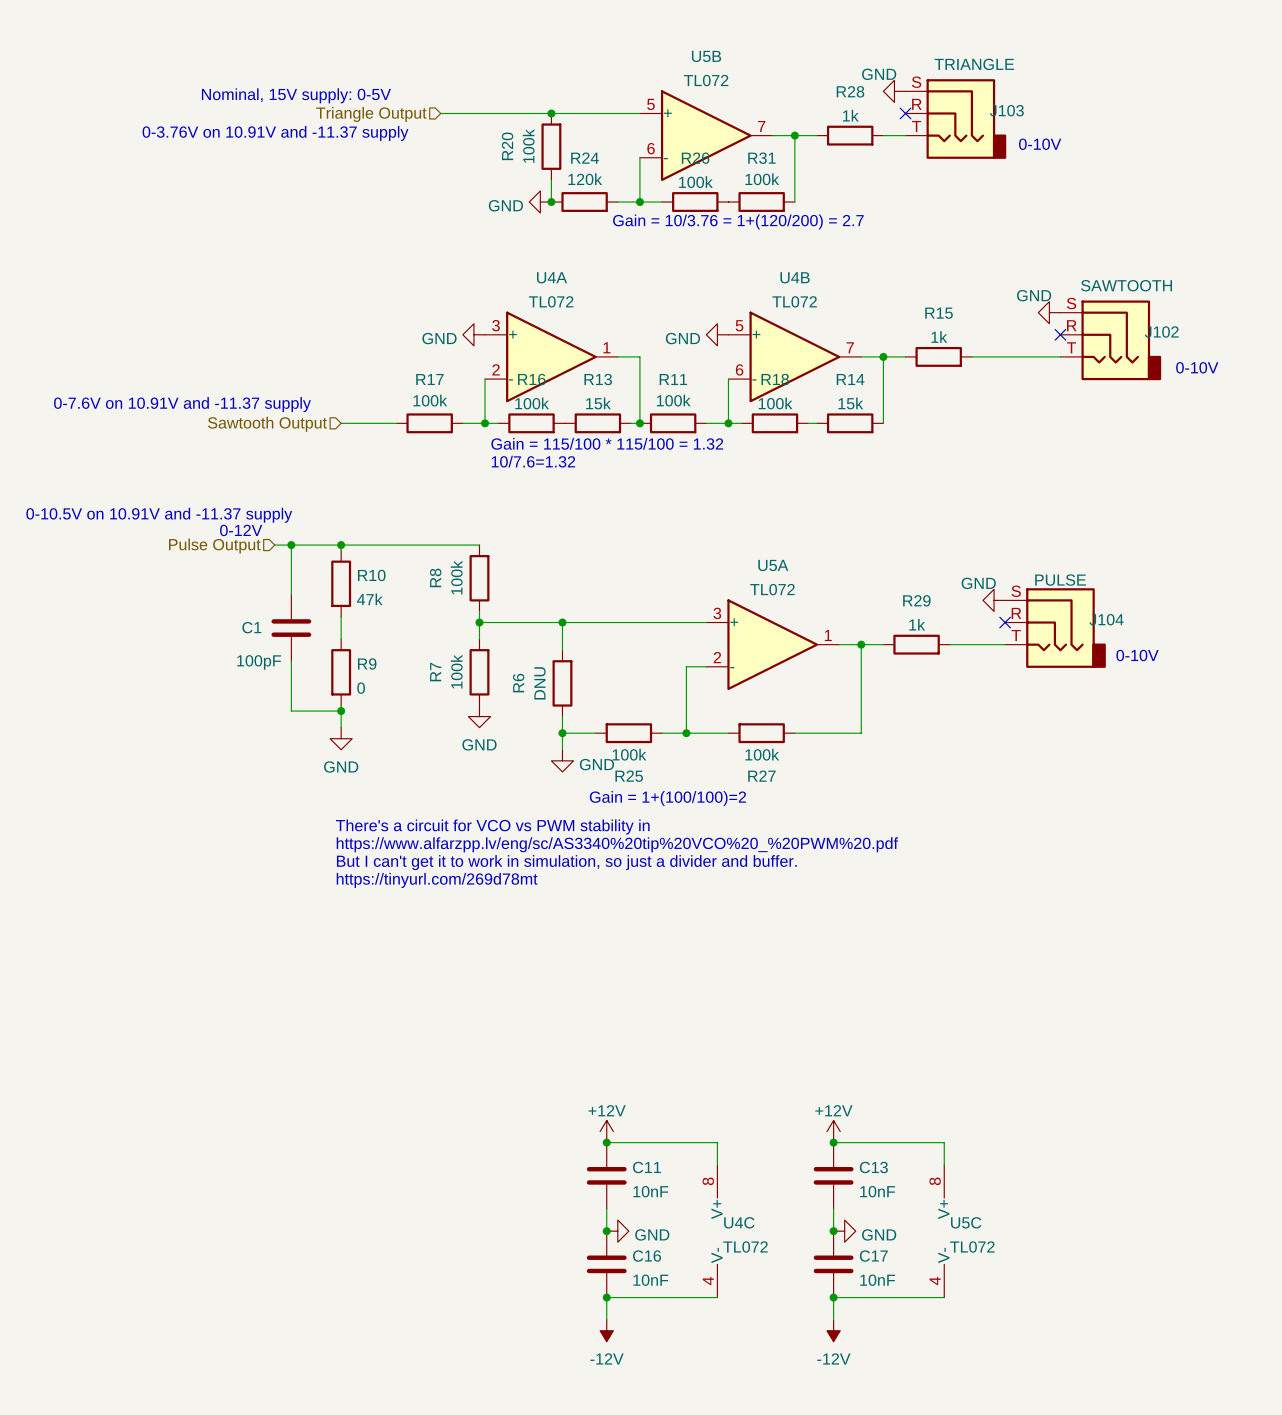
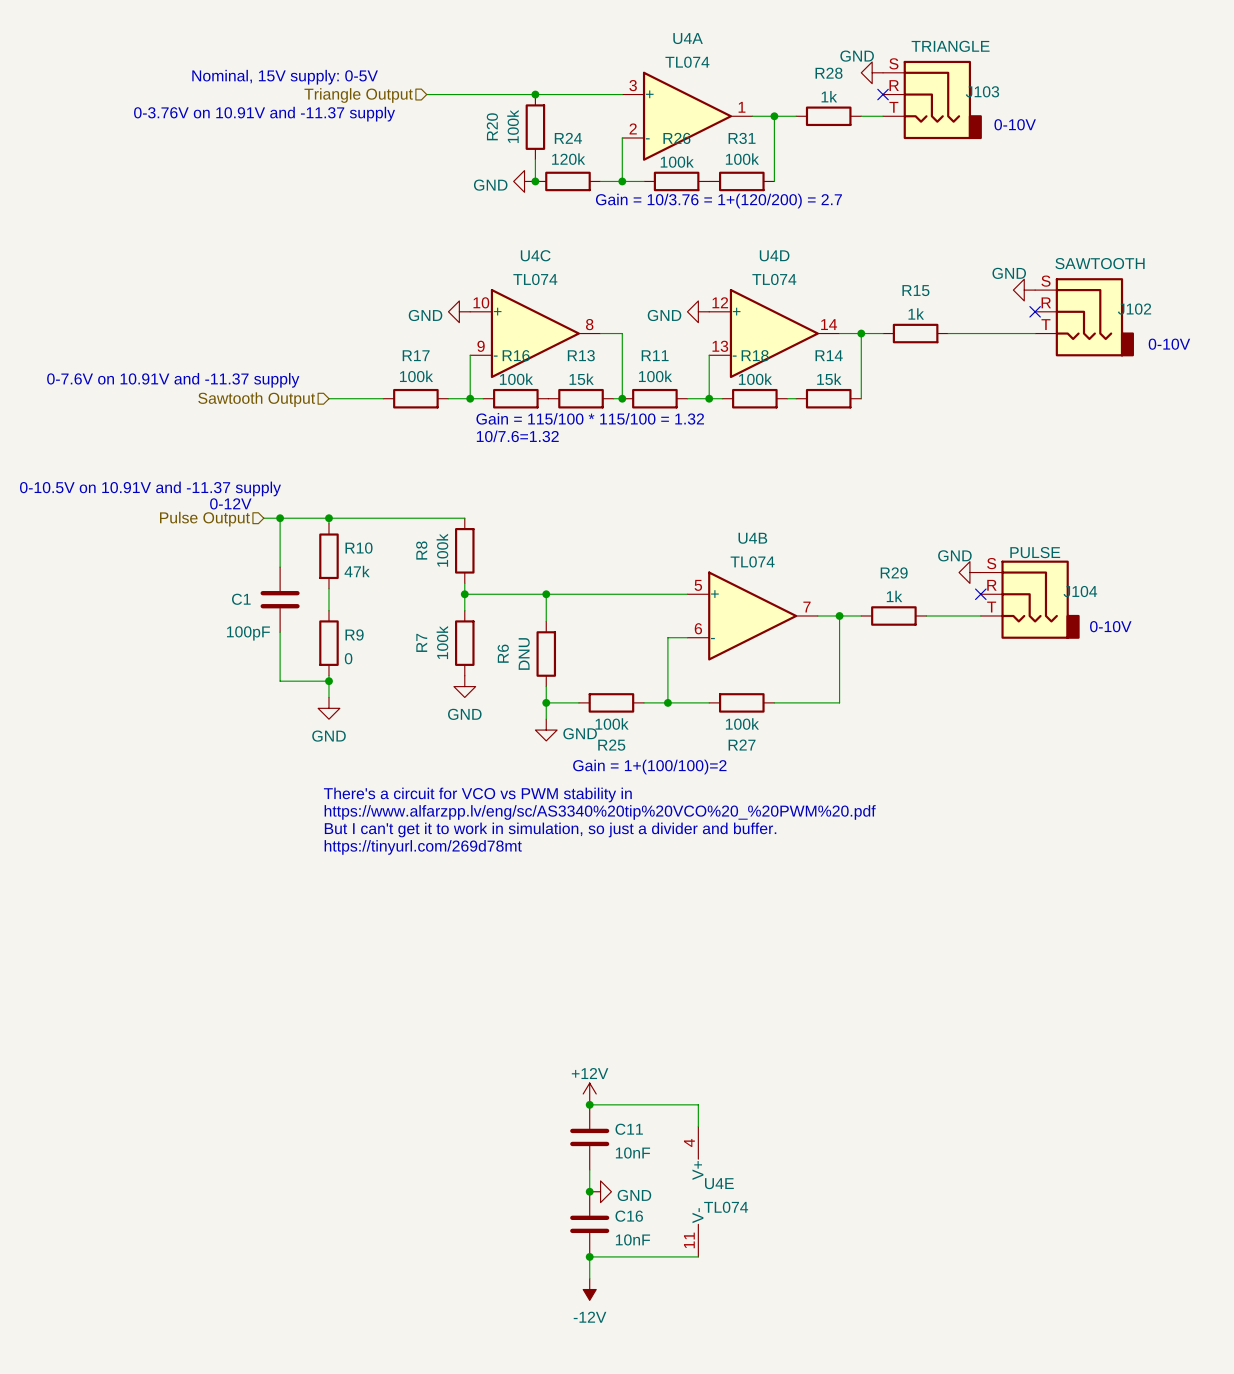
U5B: TL072 (706, 135) -> none
U4A value: TL072 (551, 301) -> TL074 (687, 62)
U4B value: TL072 (794, 301) -> TL074 (752, 561)
U4A position: (551, 356) -> (687, 116)
U4B position: (794, 356) -> (752, 615)
U4D: none -> TL074 (774, 333)
U5A: TL072 (772, 644) -> none
power symbol: +12V (833, 1131) -> none
wire: (833, 1142) (944, 1142) (944, 1164) -> none
junction: (833, 1142) -> none
U4C symbol: [717, 1164, 718, 1298] -> [470, 289, 601, 379]
C13: 10nF (833, 1175) -> none
wire: (833, 1209) (833, 1231) -> none
U4C name position: U4C (739, 1222) -> U4C (535, 255)
U4E: none -> TL074 (698, 1191)
junction: (833, 1231) -> none
power symbol: GND (844, 1231) -> none
U5C: TL072 (944, 1231) -> none
U4C value: TL072 (745, 1247) -> TL074 (535, 279)
C17: 10nF (833, 1264) -> none
junction: (833, 1297) -> none
wire: (944, 1297) (833, 1297) (833, 1319) -> none
power symbol: -12V (833, 1330) -> none

